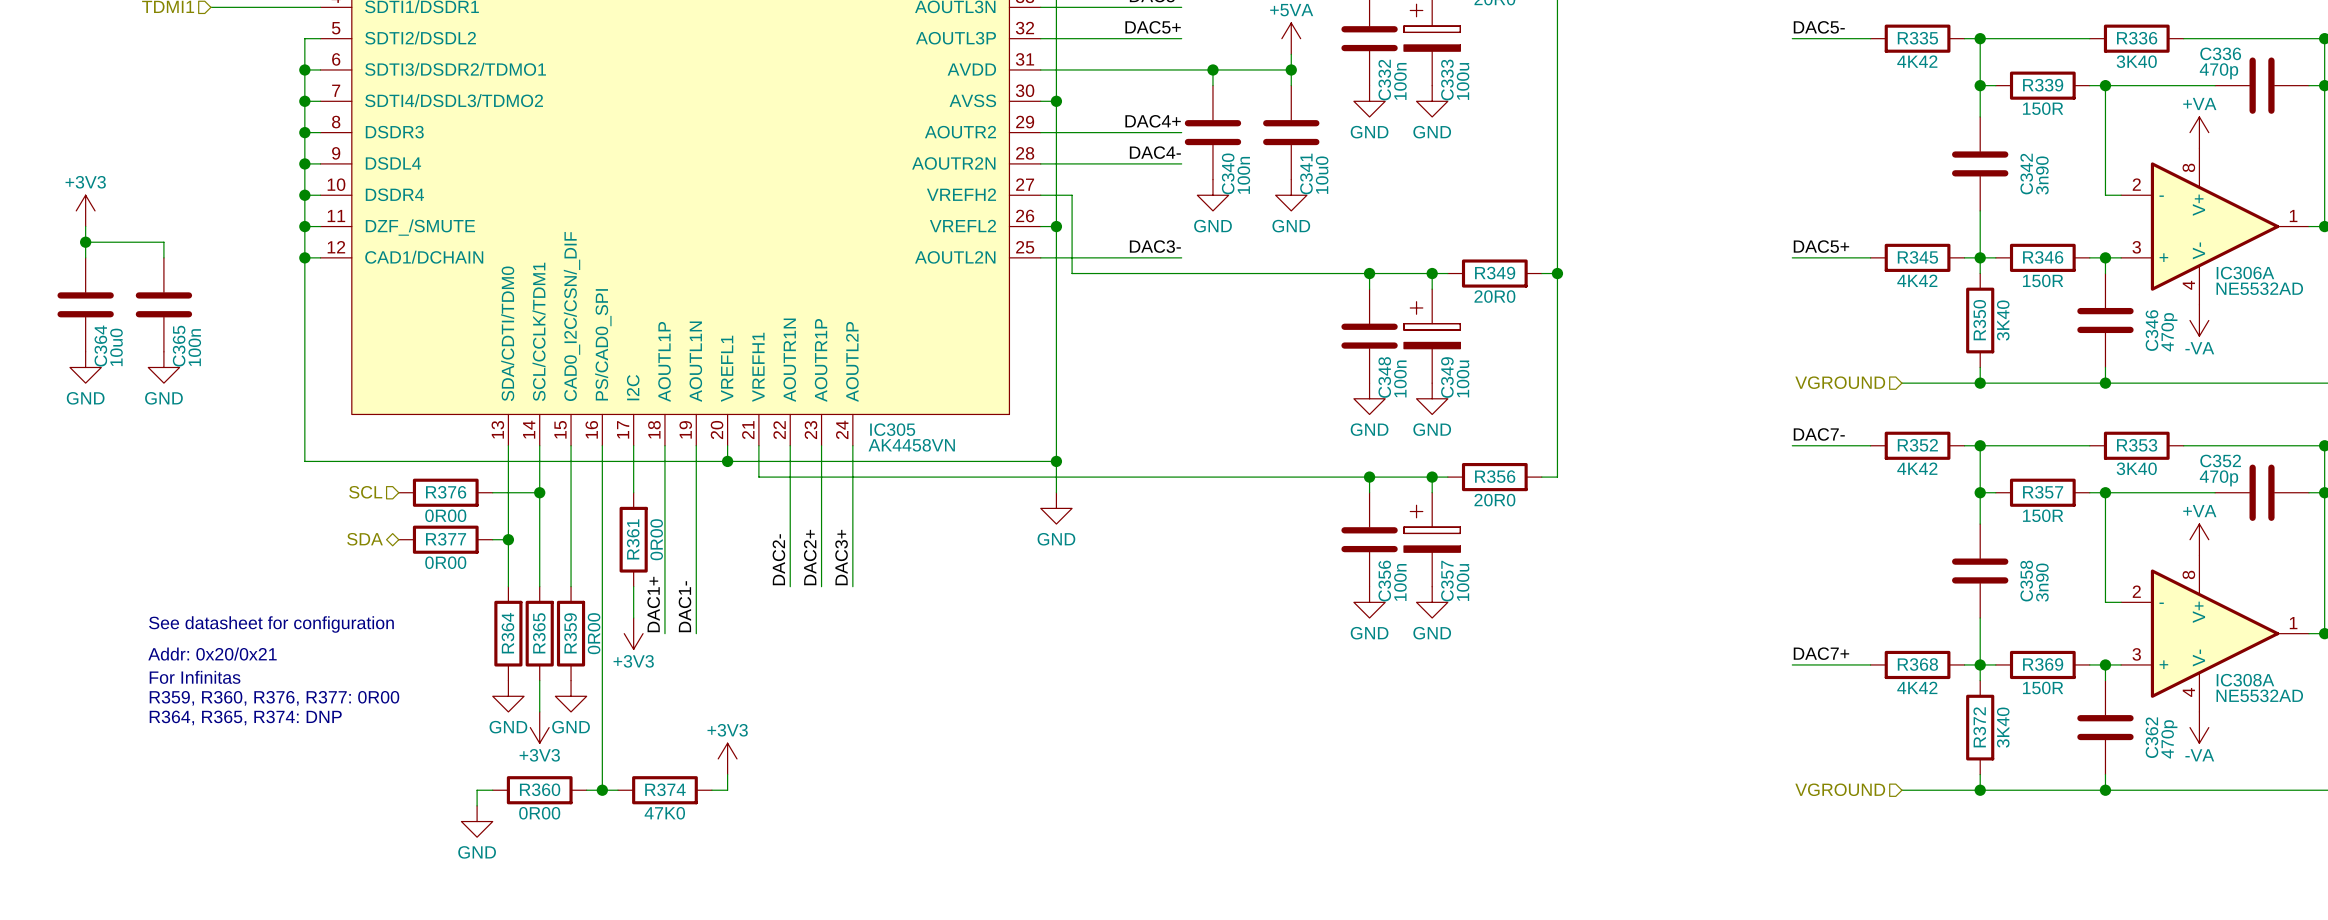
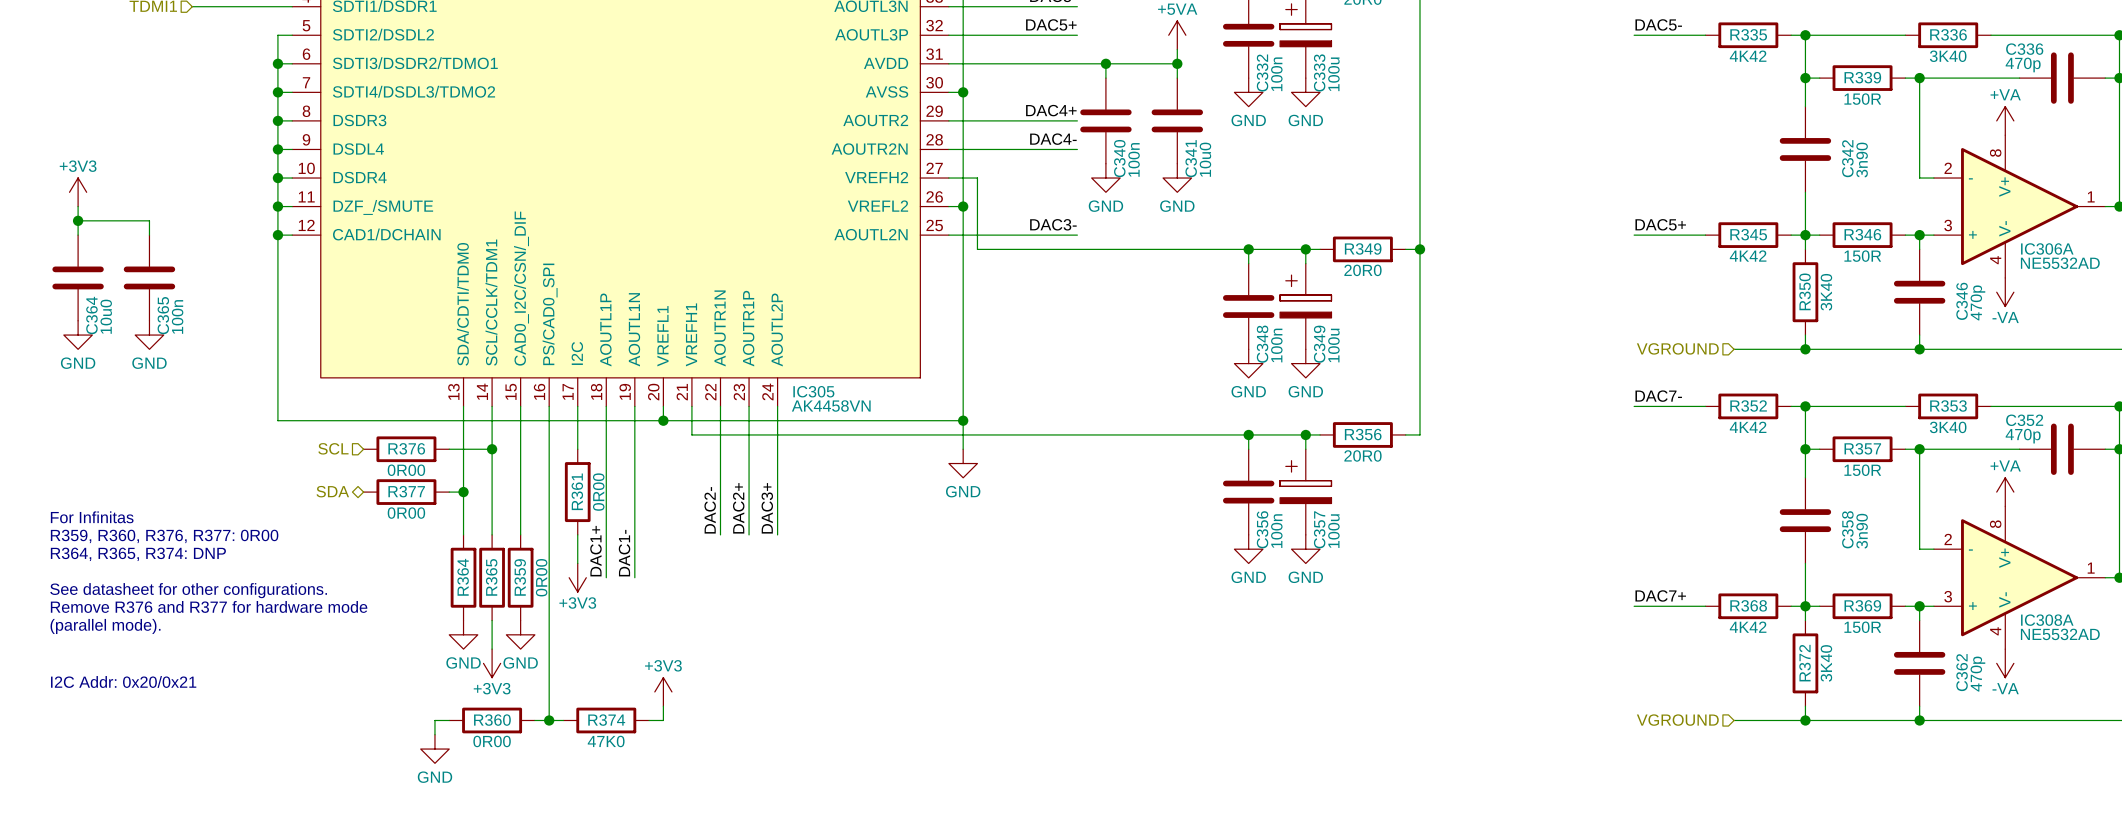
text: See datasheet for configuration (271, 624) -> See datasheet for other configurations. (188, 590)
text: Addr: 0x20/0x21 (212, 654) -> none
text: none -> Remove R376 and R377 for hardware mode (209, 606)
text position: For Infinitas (195, 677) -> For Infinitas (92, 517)
text: none -> (parallel mode). (105, 626)
text position: R359, R360, R376, R377: 0R00 (274, 698) -> R359, R360, R376, R377: 0R00 (164, 536)
text position: R364, R365, R374: DNP (245, 717) -> R364, R365, R374: DNP (138, 554)
text: none -> I2C Addr: 0x20/0x21 (123, 681)

